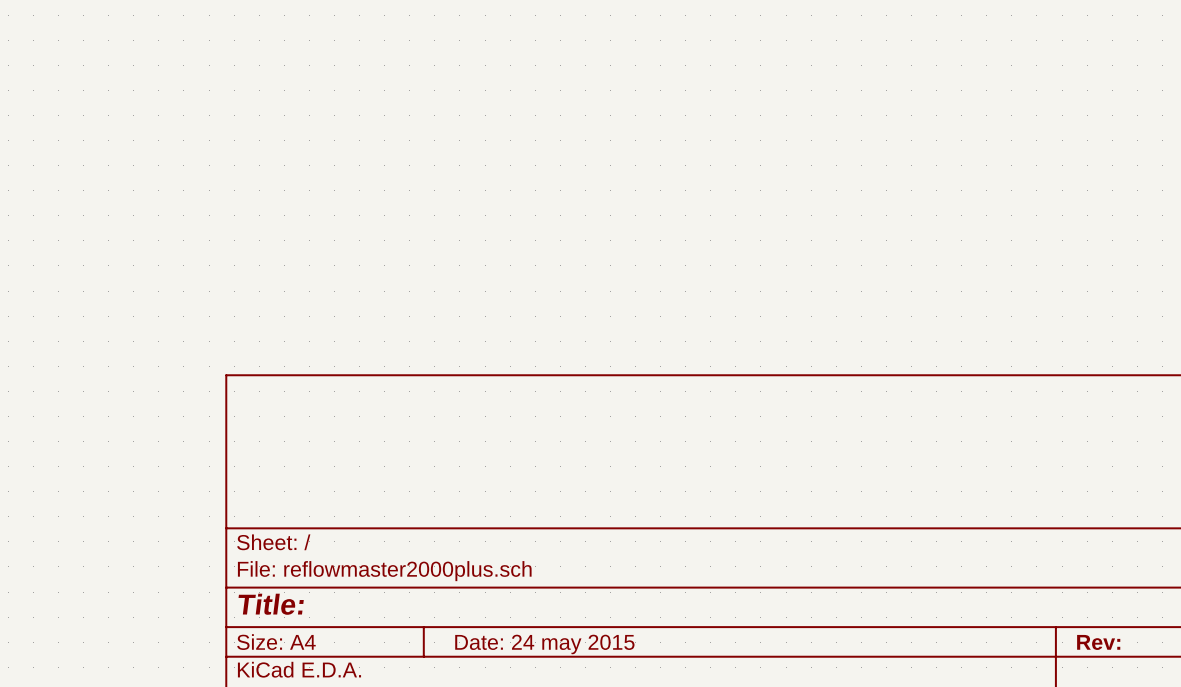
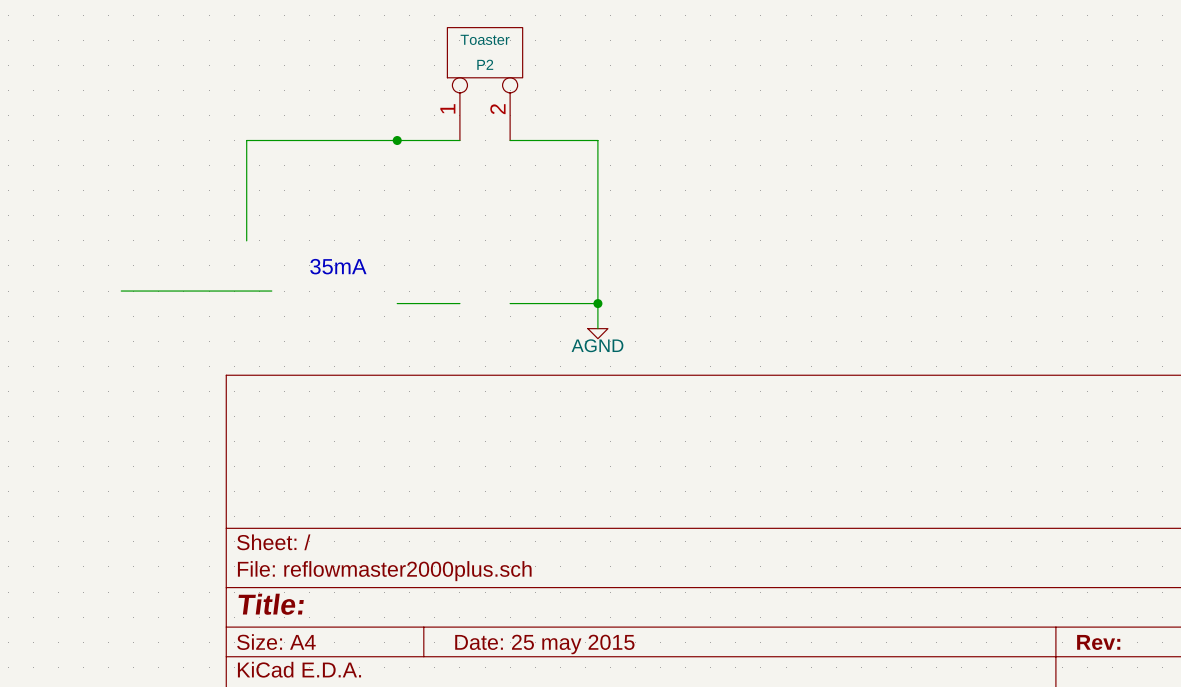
P2: none -> Toaster (485, 84)
junction: none -> (397, 140)
wire: none -> (459, 140) (246, 140) (246, 240)
wire: none -> (510, 140) (597, 140) (597, 328)
text: none -> 35mA (338, 266)
wire: none -> (121, 291) (271, 291)
wire: none -> (397, 303) (459, 303)
wire: none -> (510, 303) (597, 303)
junction: none -> (597, 303)
power symbol: none -> AGND (597, 333)
title block: Date: 24 may 2015 (544, 644) -> Date: 25 may 2015 (544, 644)

